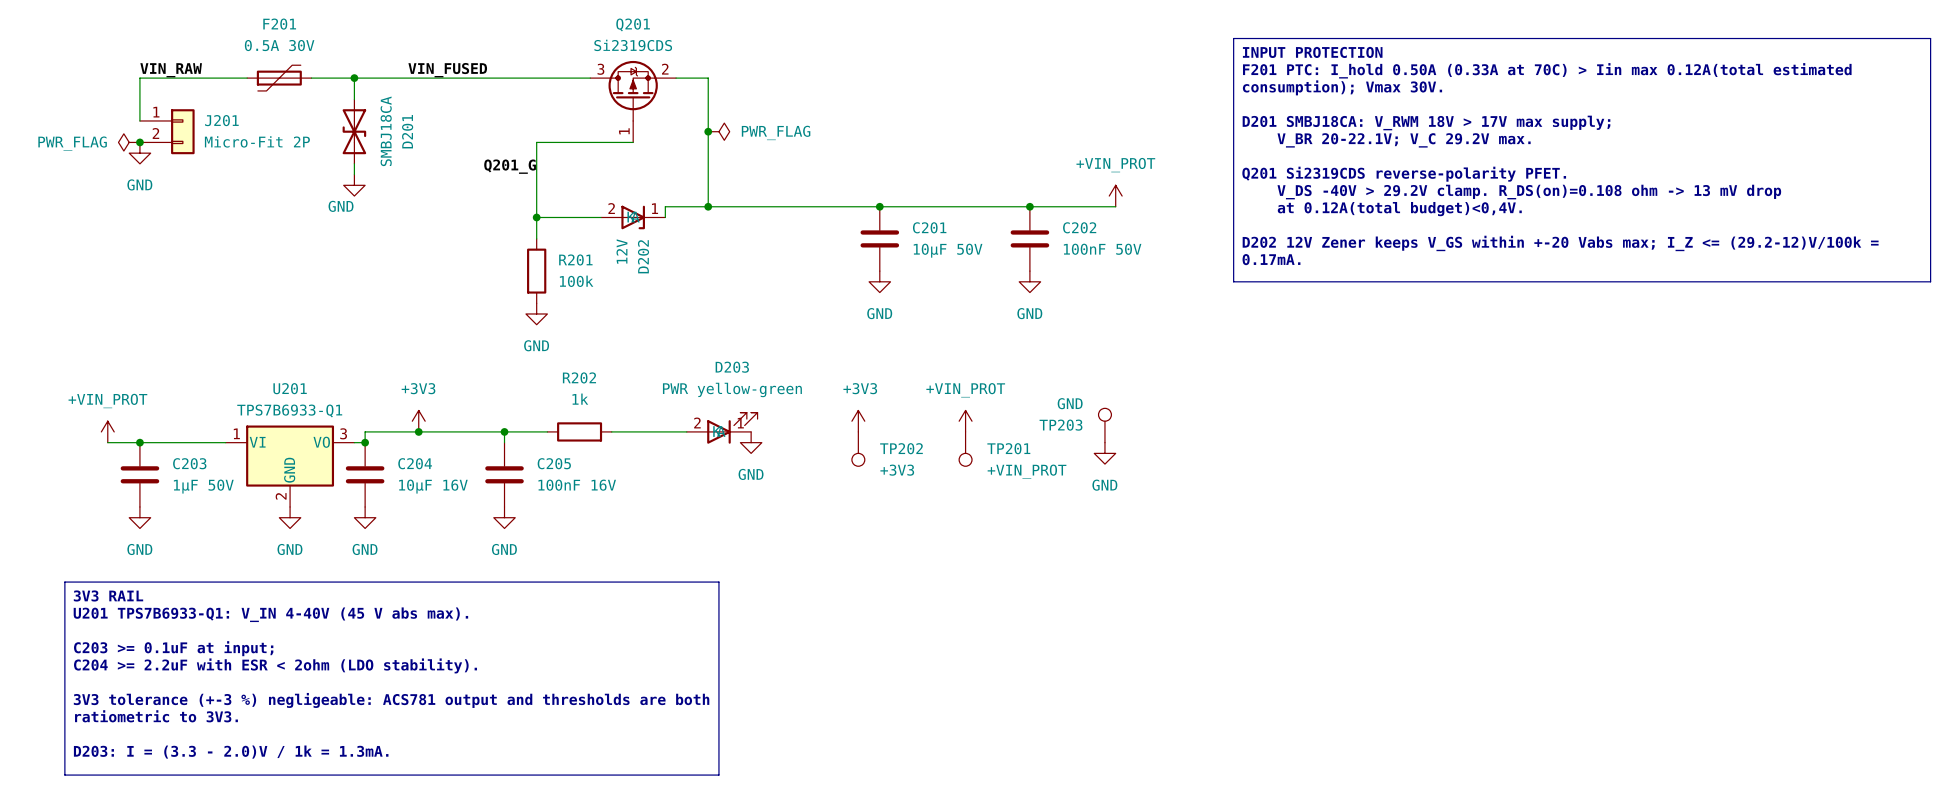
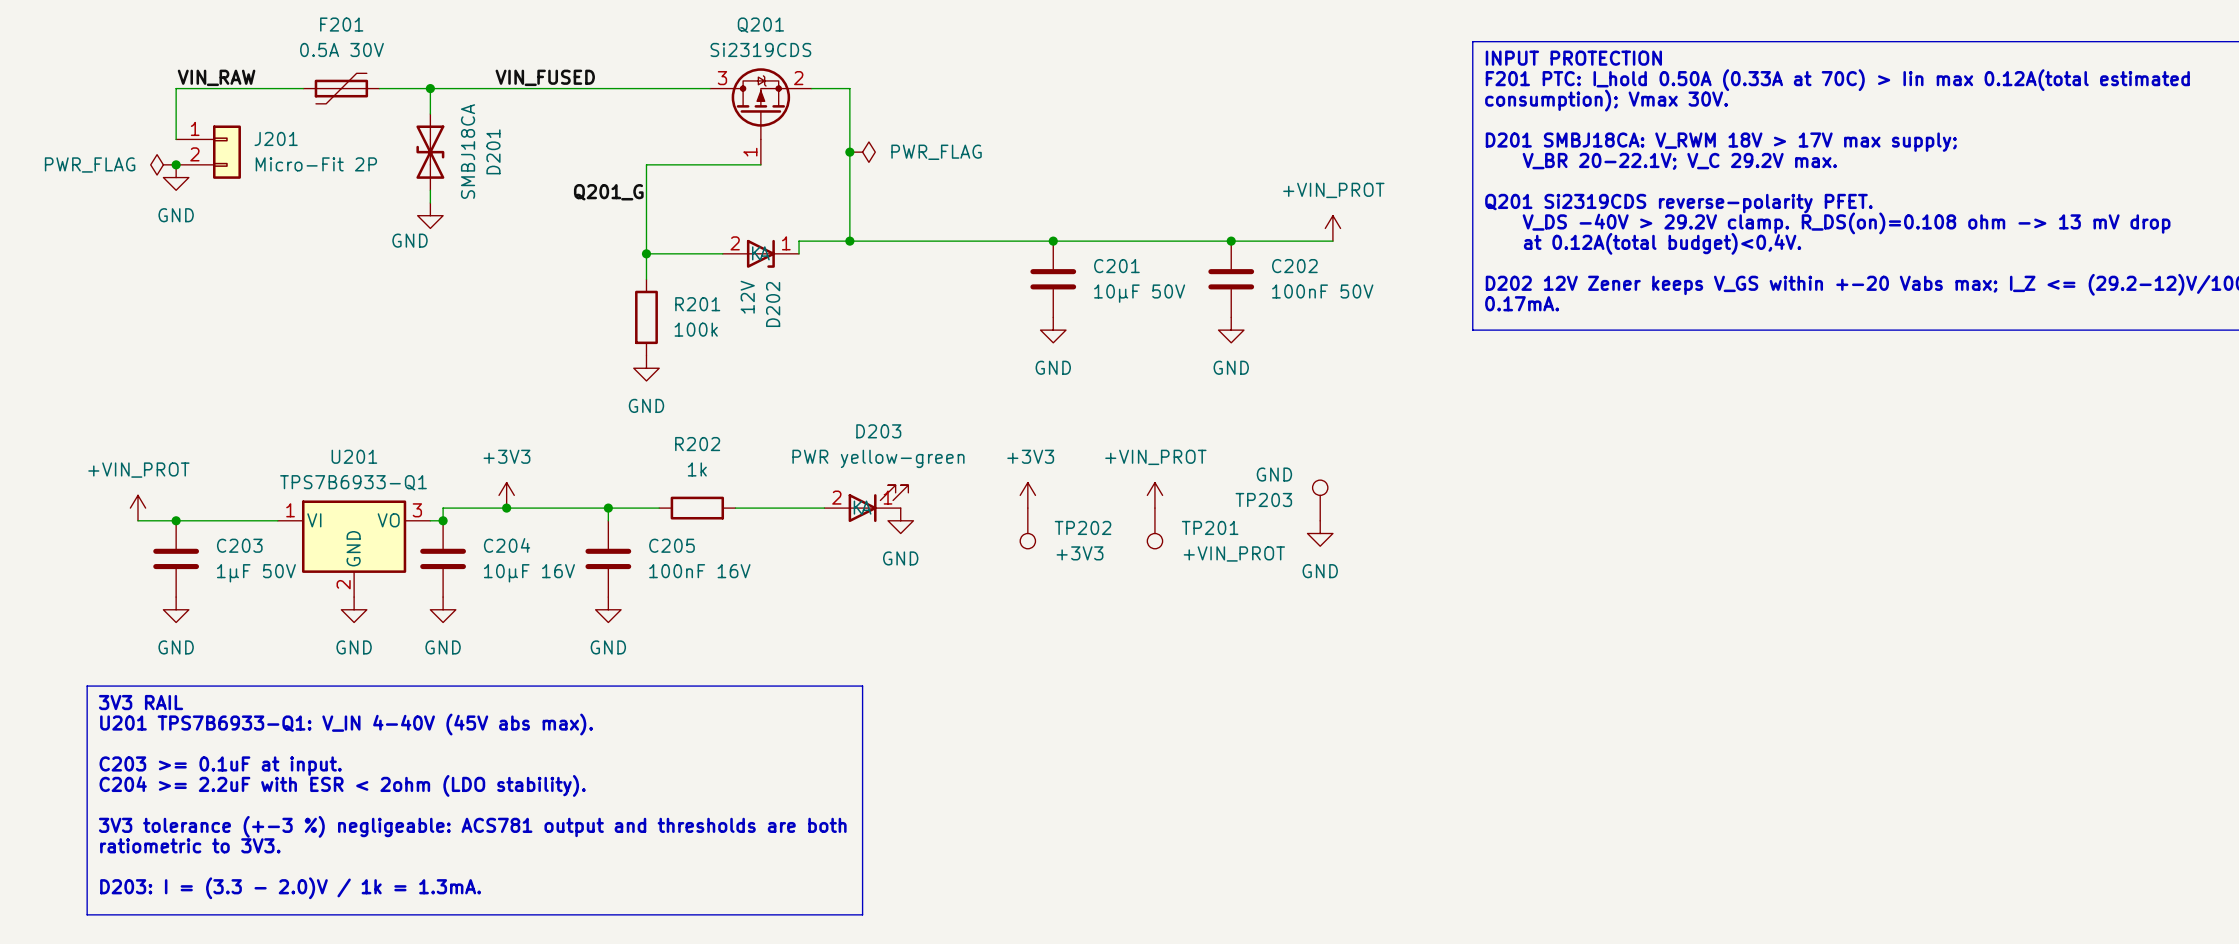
text: U201 TPS7B6933-Q1: V_IN 4-40V (45 V abs max). (270, 614) -> U201 TPS7B6933-Q1: V_IN 4-40V (45V abs max). (346, 724)
text: C203 >= 0.1uF at input; (173, 648) -> C203 >= 0.1uF at input. (220, 766)

